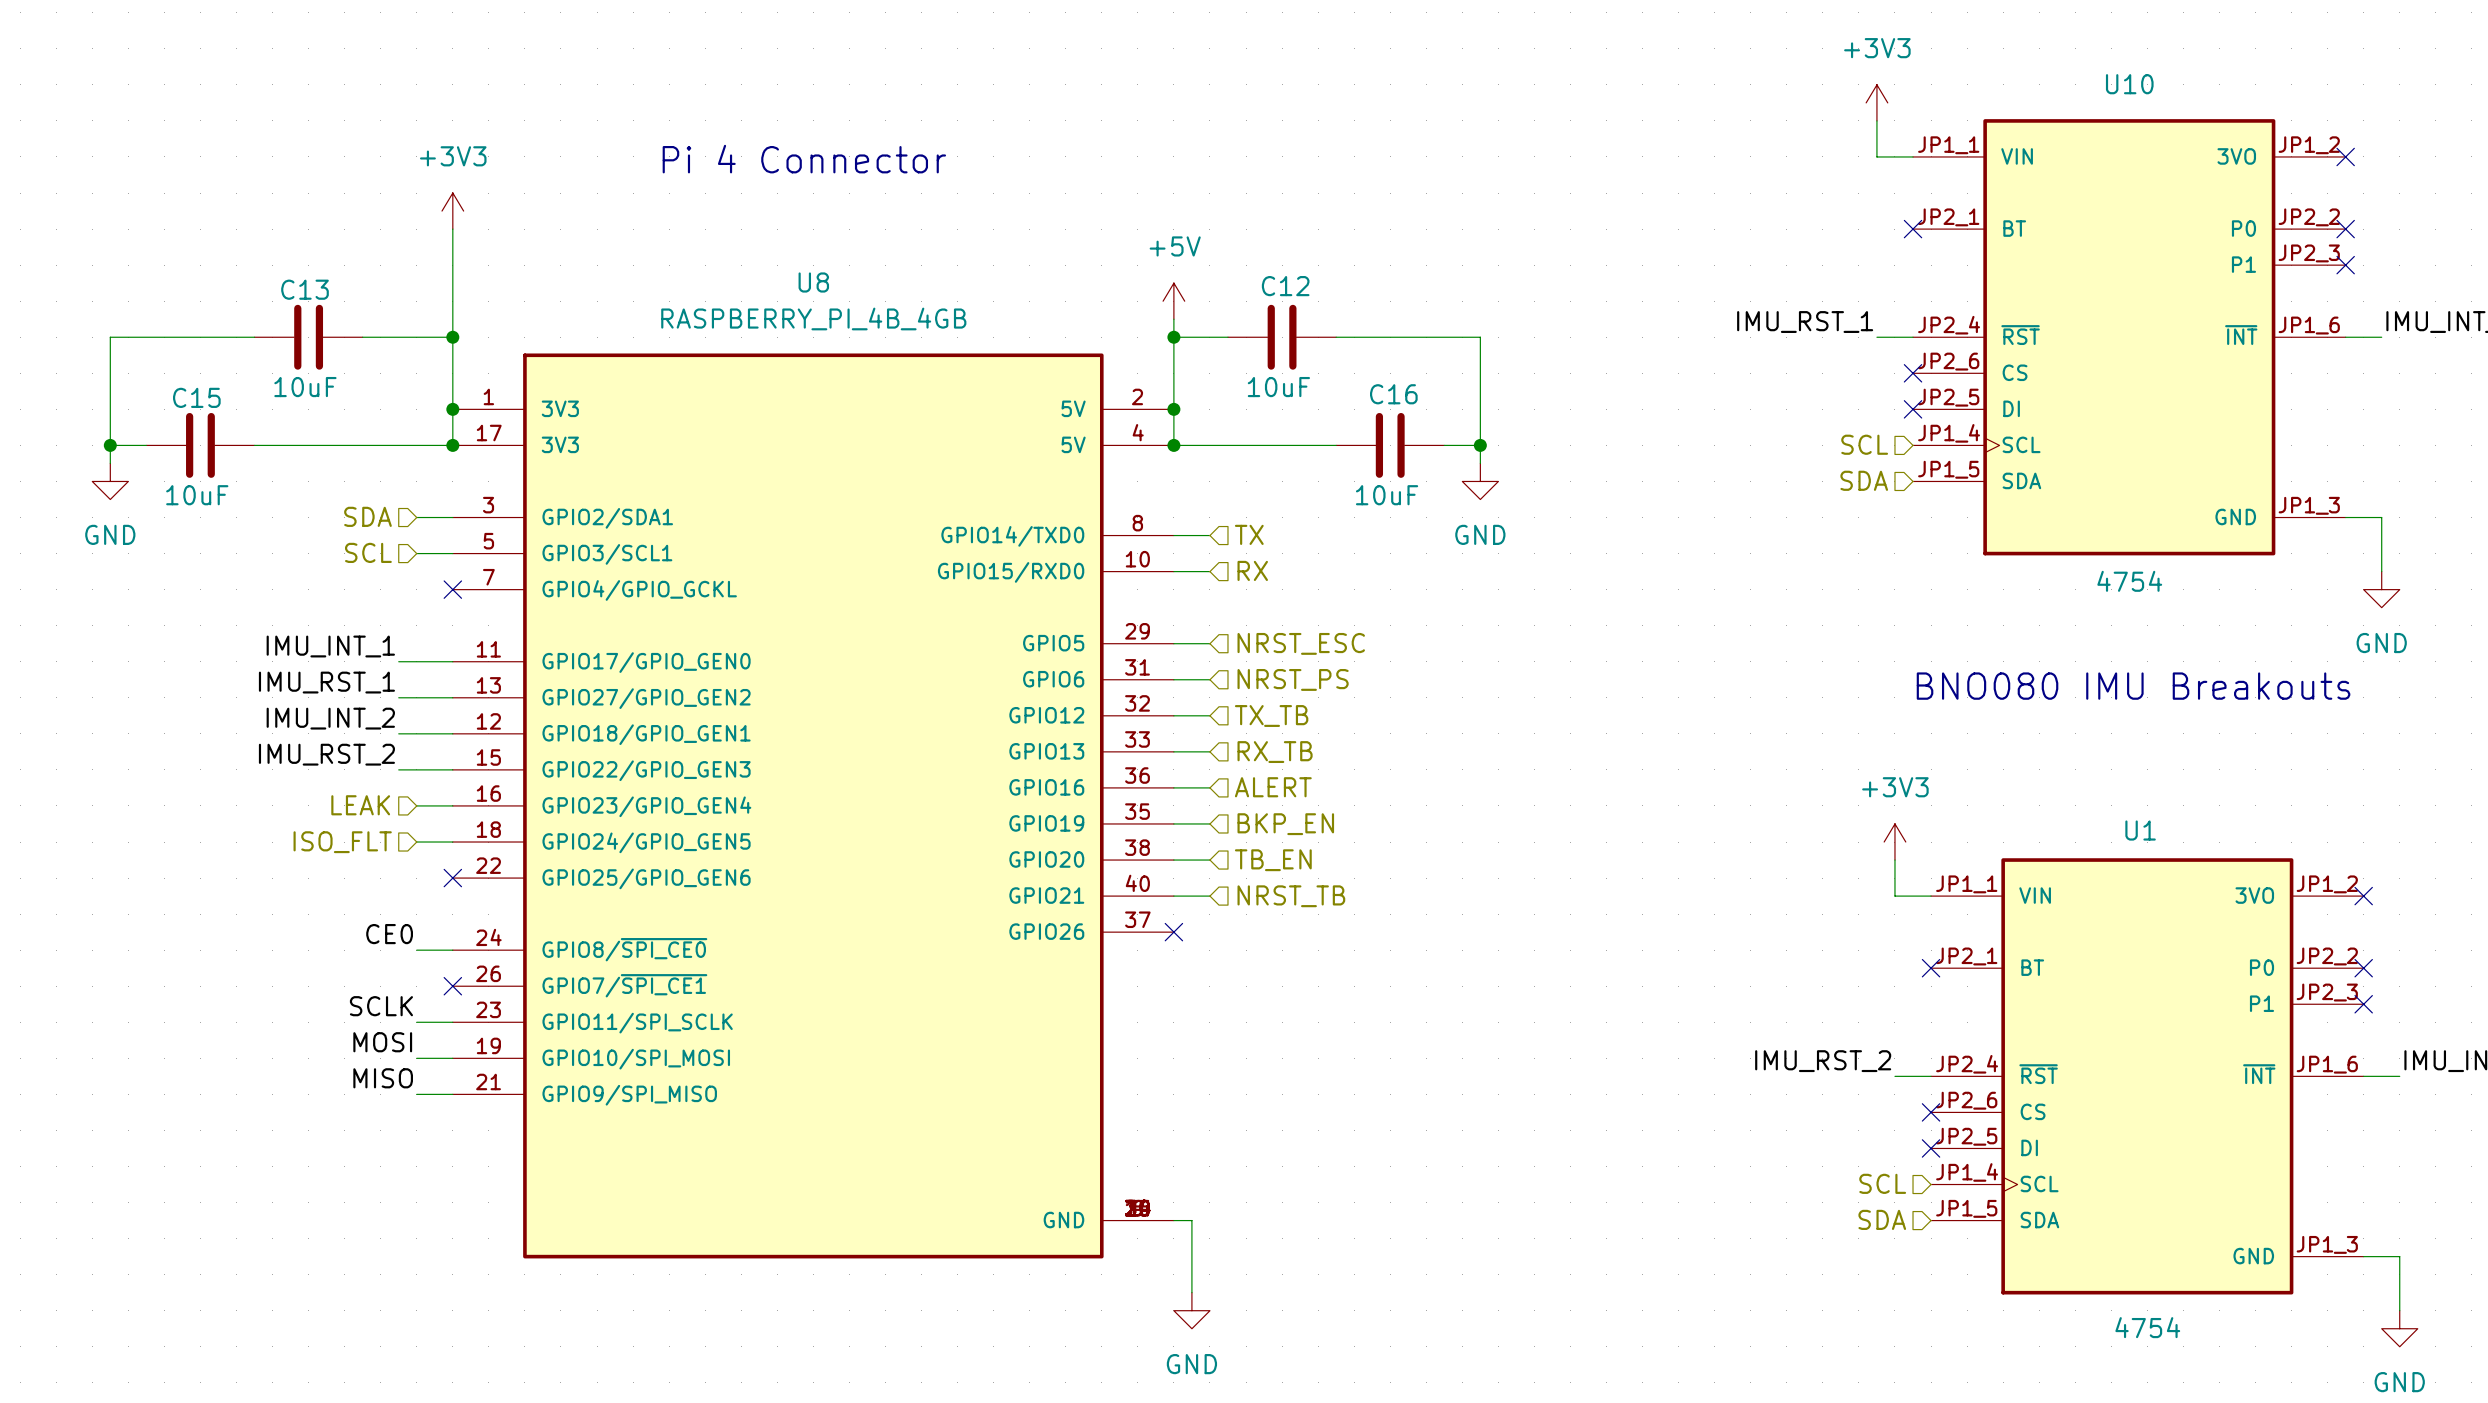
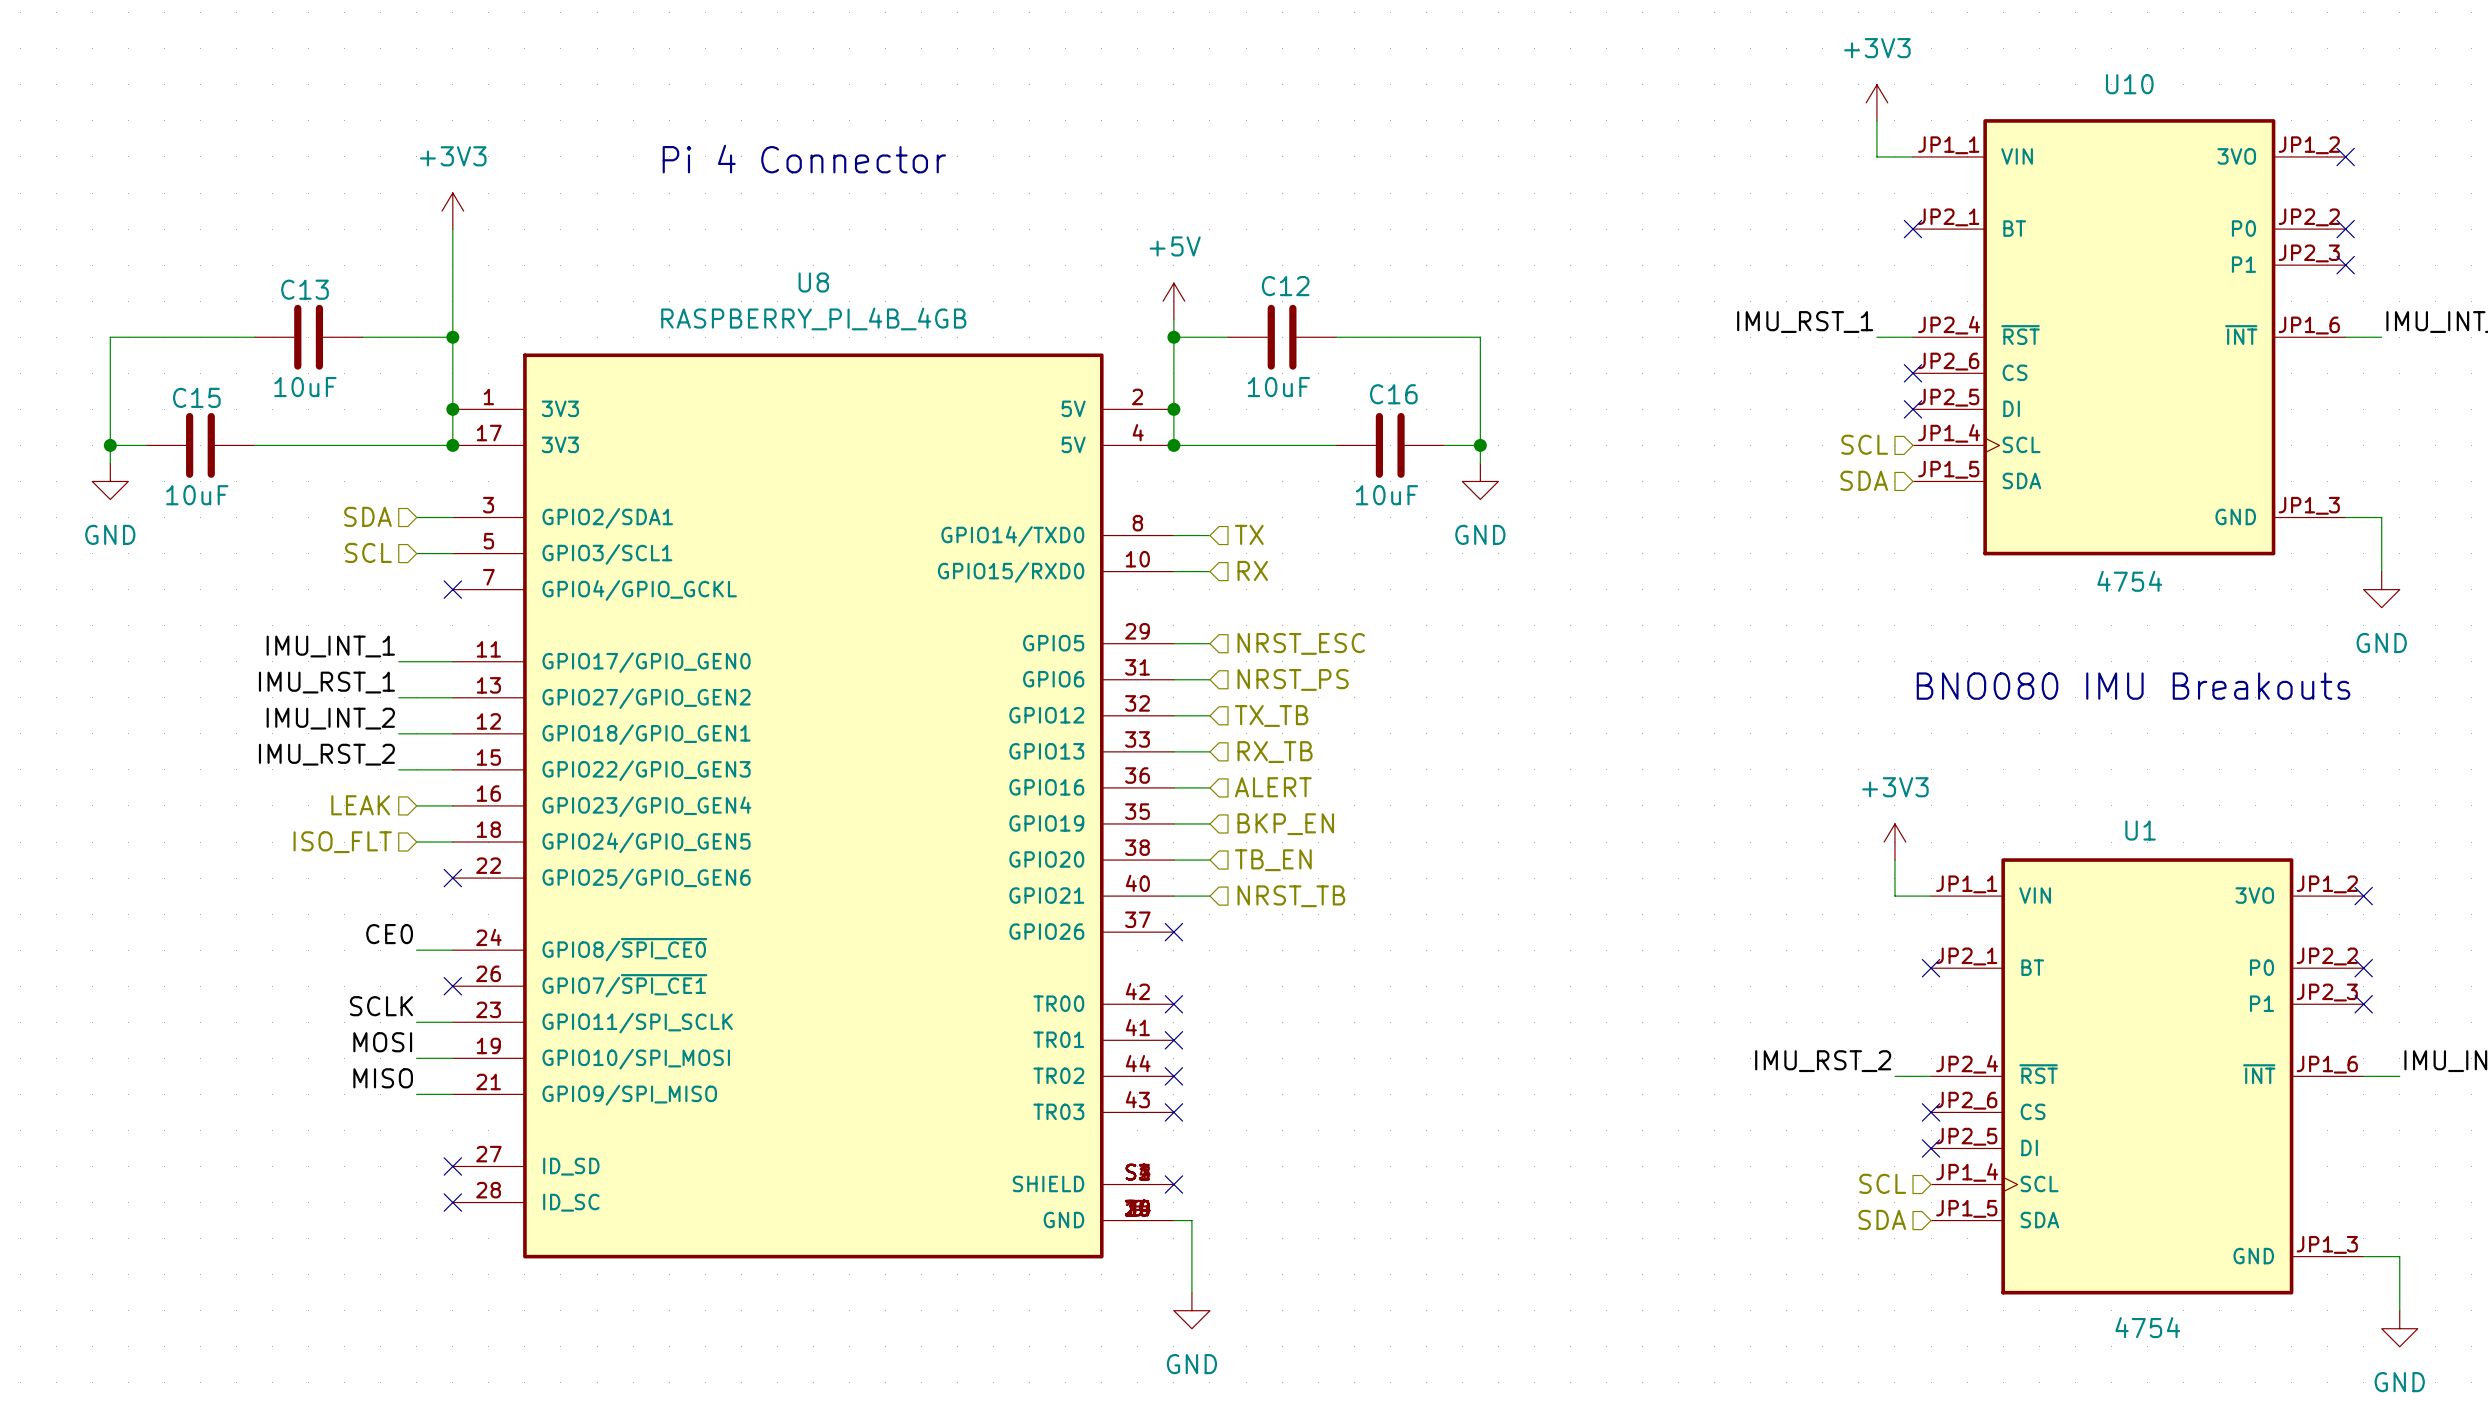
U8 symbol: [452, 353, 1174, 1259] -> [452, 353, 1174, 1259]
no-connect mark: none -> (1173, 1004)
no-connect mark: none -> (1173, 1040)
no-connect mark: none -> (1173, 1076)
no-connect mark: none -> (1173, 1112)
no-connect mark: none -> (452, 1166)
no-connect mark: none -> (1173, 1184)
no-connect mark: none -> (452, 1202)

